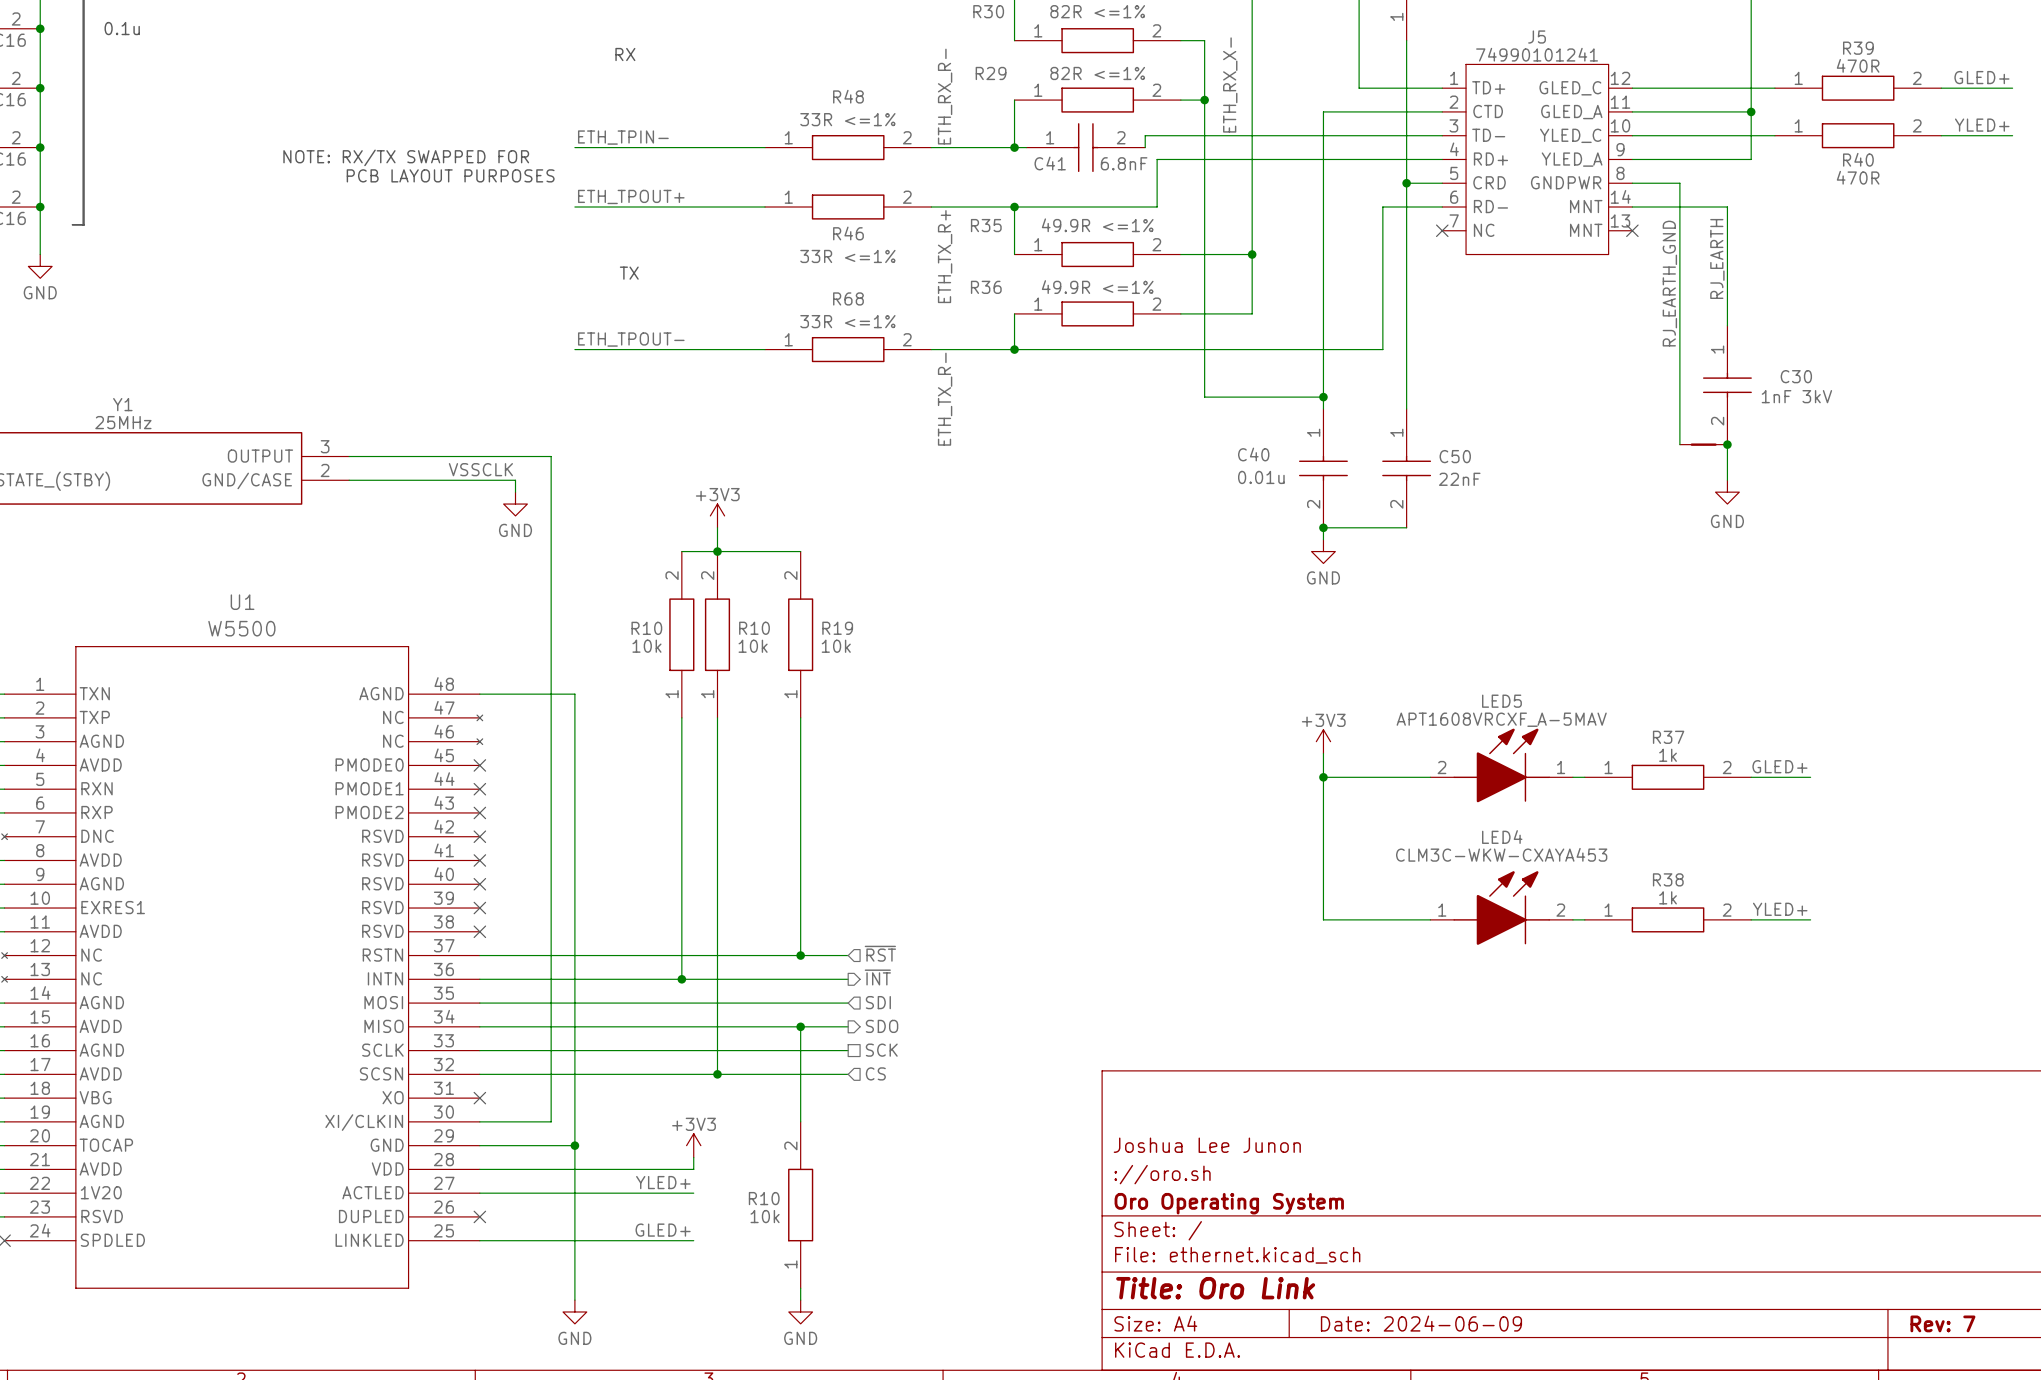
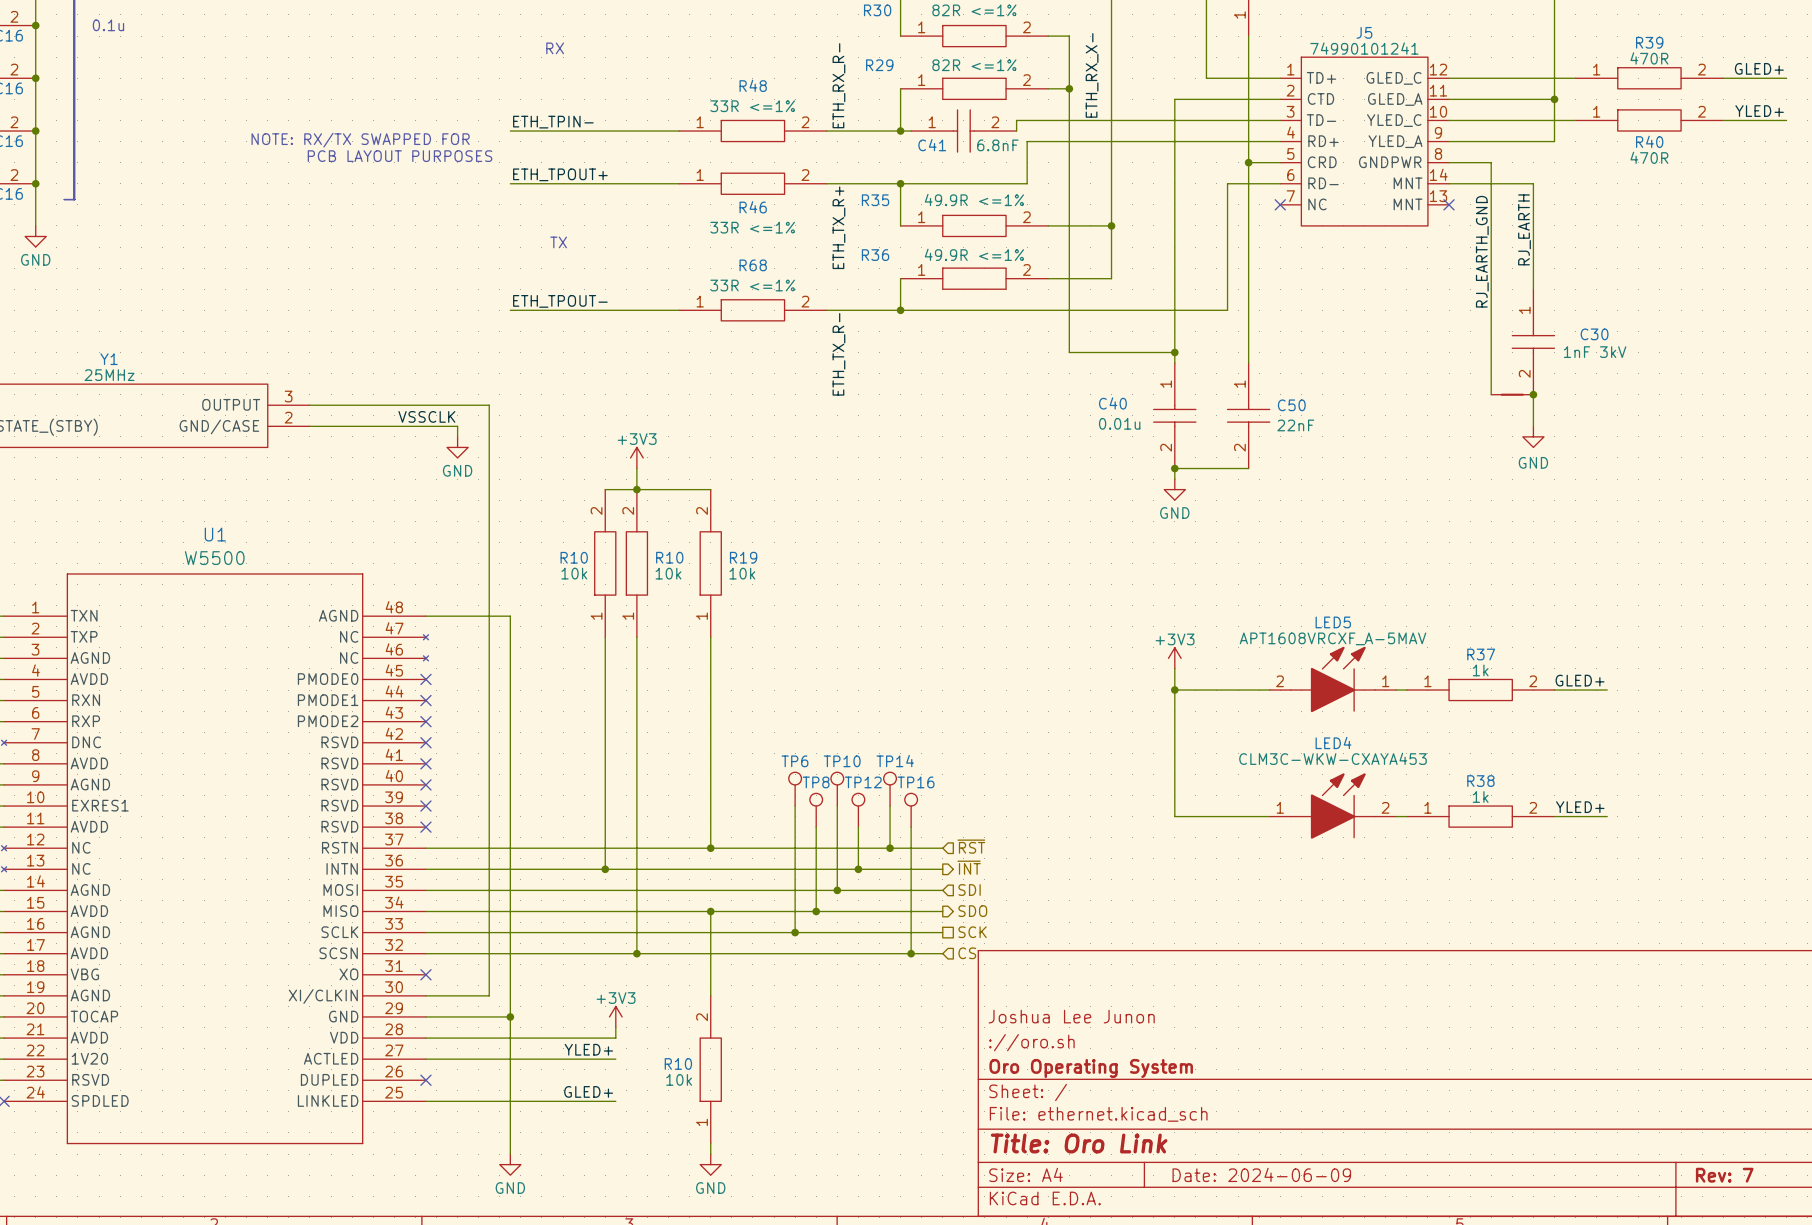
TP6: none -> (795, 789)
TP10: none -> (837, 789)
TP14: none -> (890, 789)
wire: none -> (795, 806) (795, 932)
wire: none -> (837, 806) (837, 890)
wire: none -> (890, 806) (890, 848)
TP8: none -> (816, 810)
TP12: none -> (858, 810)
TP16: none -> (911, 810)
wire: none -> (816, 827) (816, 911)
wire: none -> (858, 827) (858, 869)
wire: none -> (911, 827) (911, 953)
hierarchical label position: ~{RST} (880, 953) -> ~{RST} (971, 846)
wire: none -> (752, 848) (942, 848)
junction: none -> (890, 848)
hierarchical label position: ~{INT} (877, 977) -> ~{INT} (969, 867)
wire: none -> (752, 869) (942, 869)
junction: none -> (858, 869)
hierarchical label position: SDI (878, 1002) -> SDI (969, 890)
wire: none -> (752, 890) (942, 890)
junction: none -> (837, 890)
wire: none -> (752, 911) (942, 911)
hierarchical label position: SDO (882, 1026) -> SDO (972, 911)
junction: none -> (816, 911)
wire: none -> (752, 932) (942, 932)
hierarchical label position: SCK (881, 1050) -> SCK (972, 932)
junction: none -> (795, 932)
hierarchical label position: CS (875, 1073) -> CS (967, 953)
wire: none -> (752, 953) (942, 953)
junction: none -> (911, 953)

